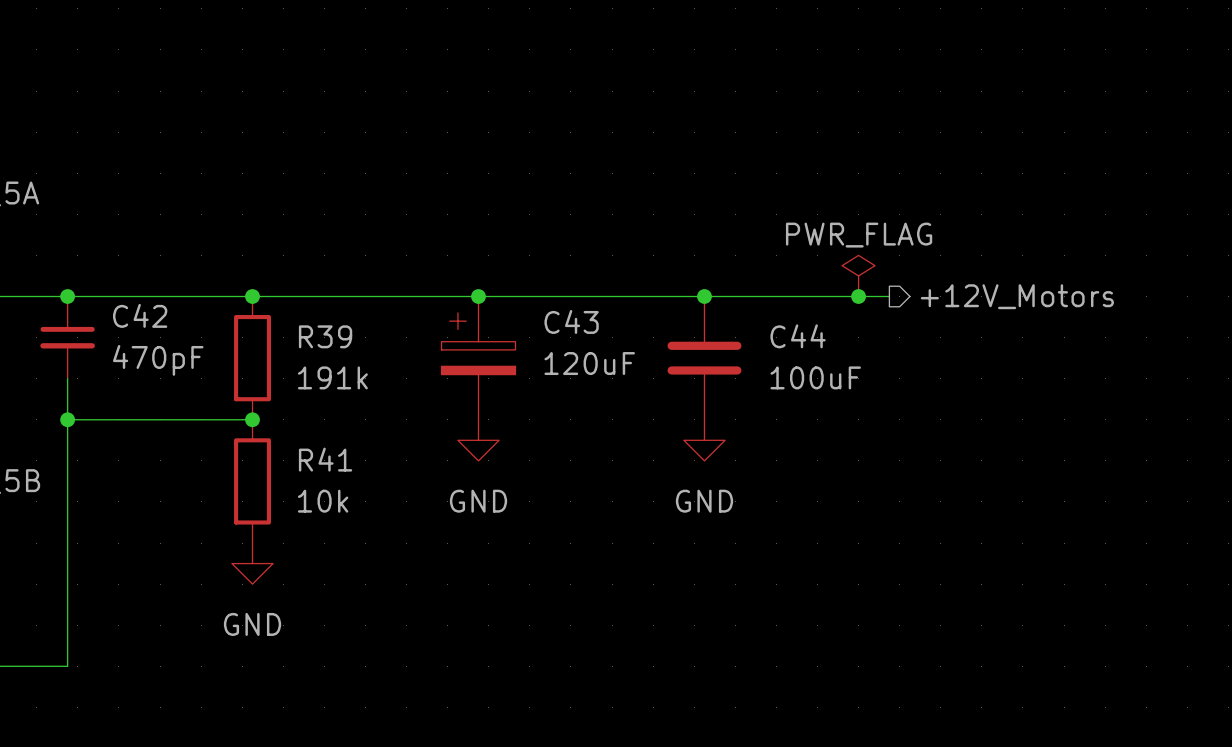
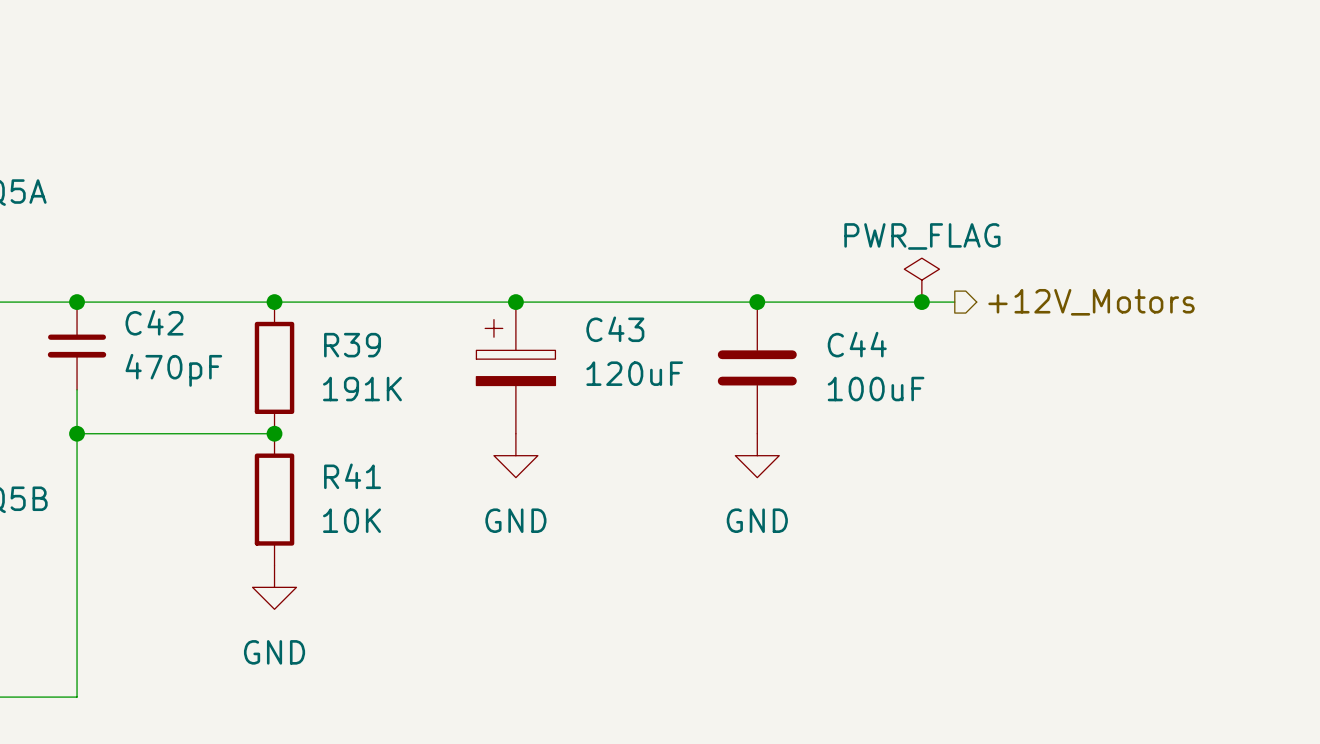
R39 value: 191k (332, 377) -> 191K (362, 389)
R41 value: 10k (323, 501) -> 10K (352, 520)

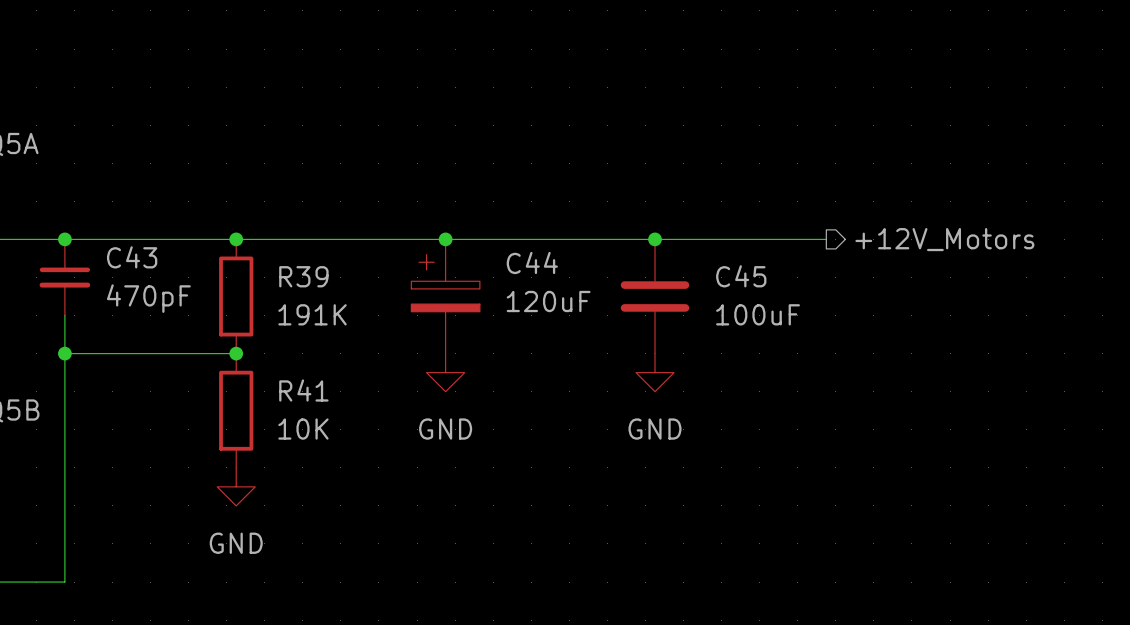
power symbol: PWR_FLAG (921, 280) -> none
junction: (921, 302) -> none
C42 name: C42 (154, 322) -> C43 (132, 257)
C43 name: C43 (615, 329) -> C44 (532, 262)
C44 name: C44 (857, 344) -> C45 (741, 276)

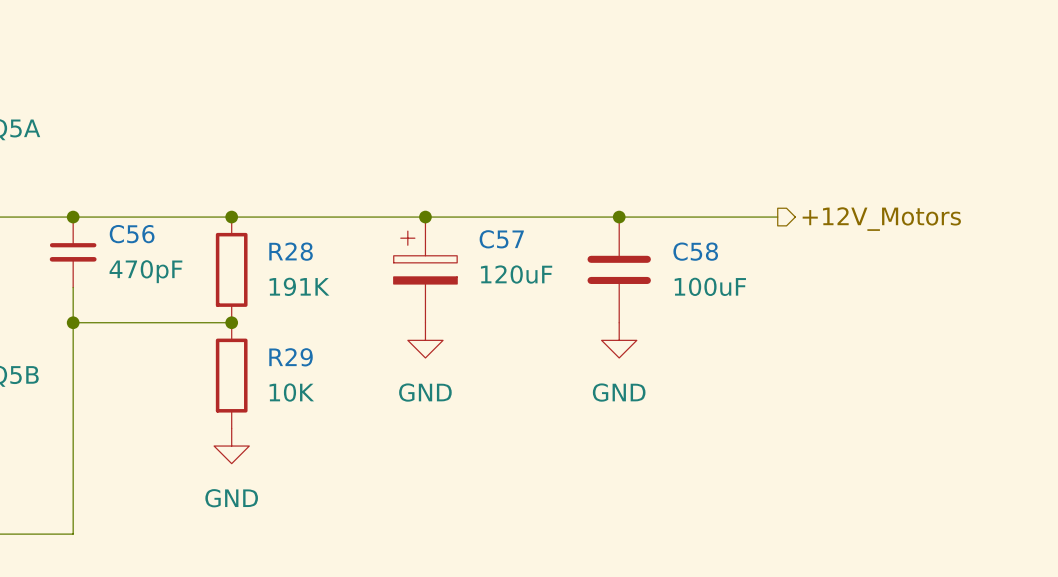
C43 name: C43 (132, 257) -> C56 (132, 234)
C44 name: C44 (532, 262) -> C57 (501, 239)
R39 name: R39 (303, 276) -> R28 (291, 251)
C45 name: C45 (741, 276) -> C58 (695, 251)
R41 name: R41 (303, 390) -> R29 (291, 357)

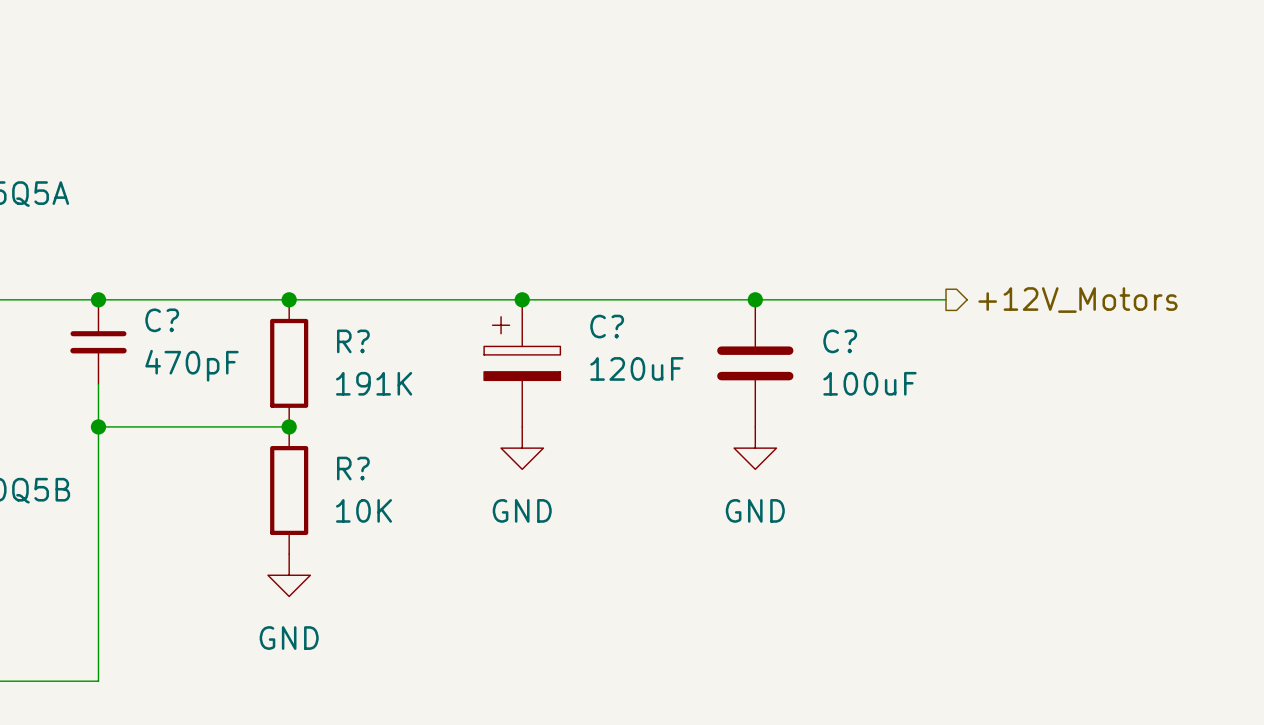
C56 name: C56 (132, 234) -> C? (162, 320)
C57 name: C57 (501, 239) -> C? (607, 326)
R28 name: R28 (291, 251) -> R? (353, 341)
C58 name: C58 (695, 251) -> C? (840, 341)
R29 name: R29 (291, 357) -> R? (353, 468)

